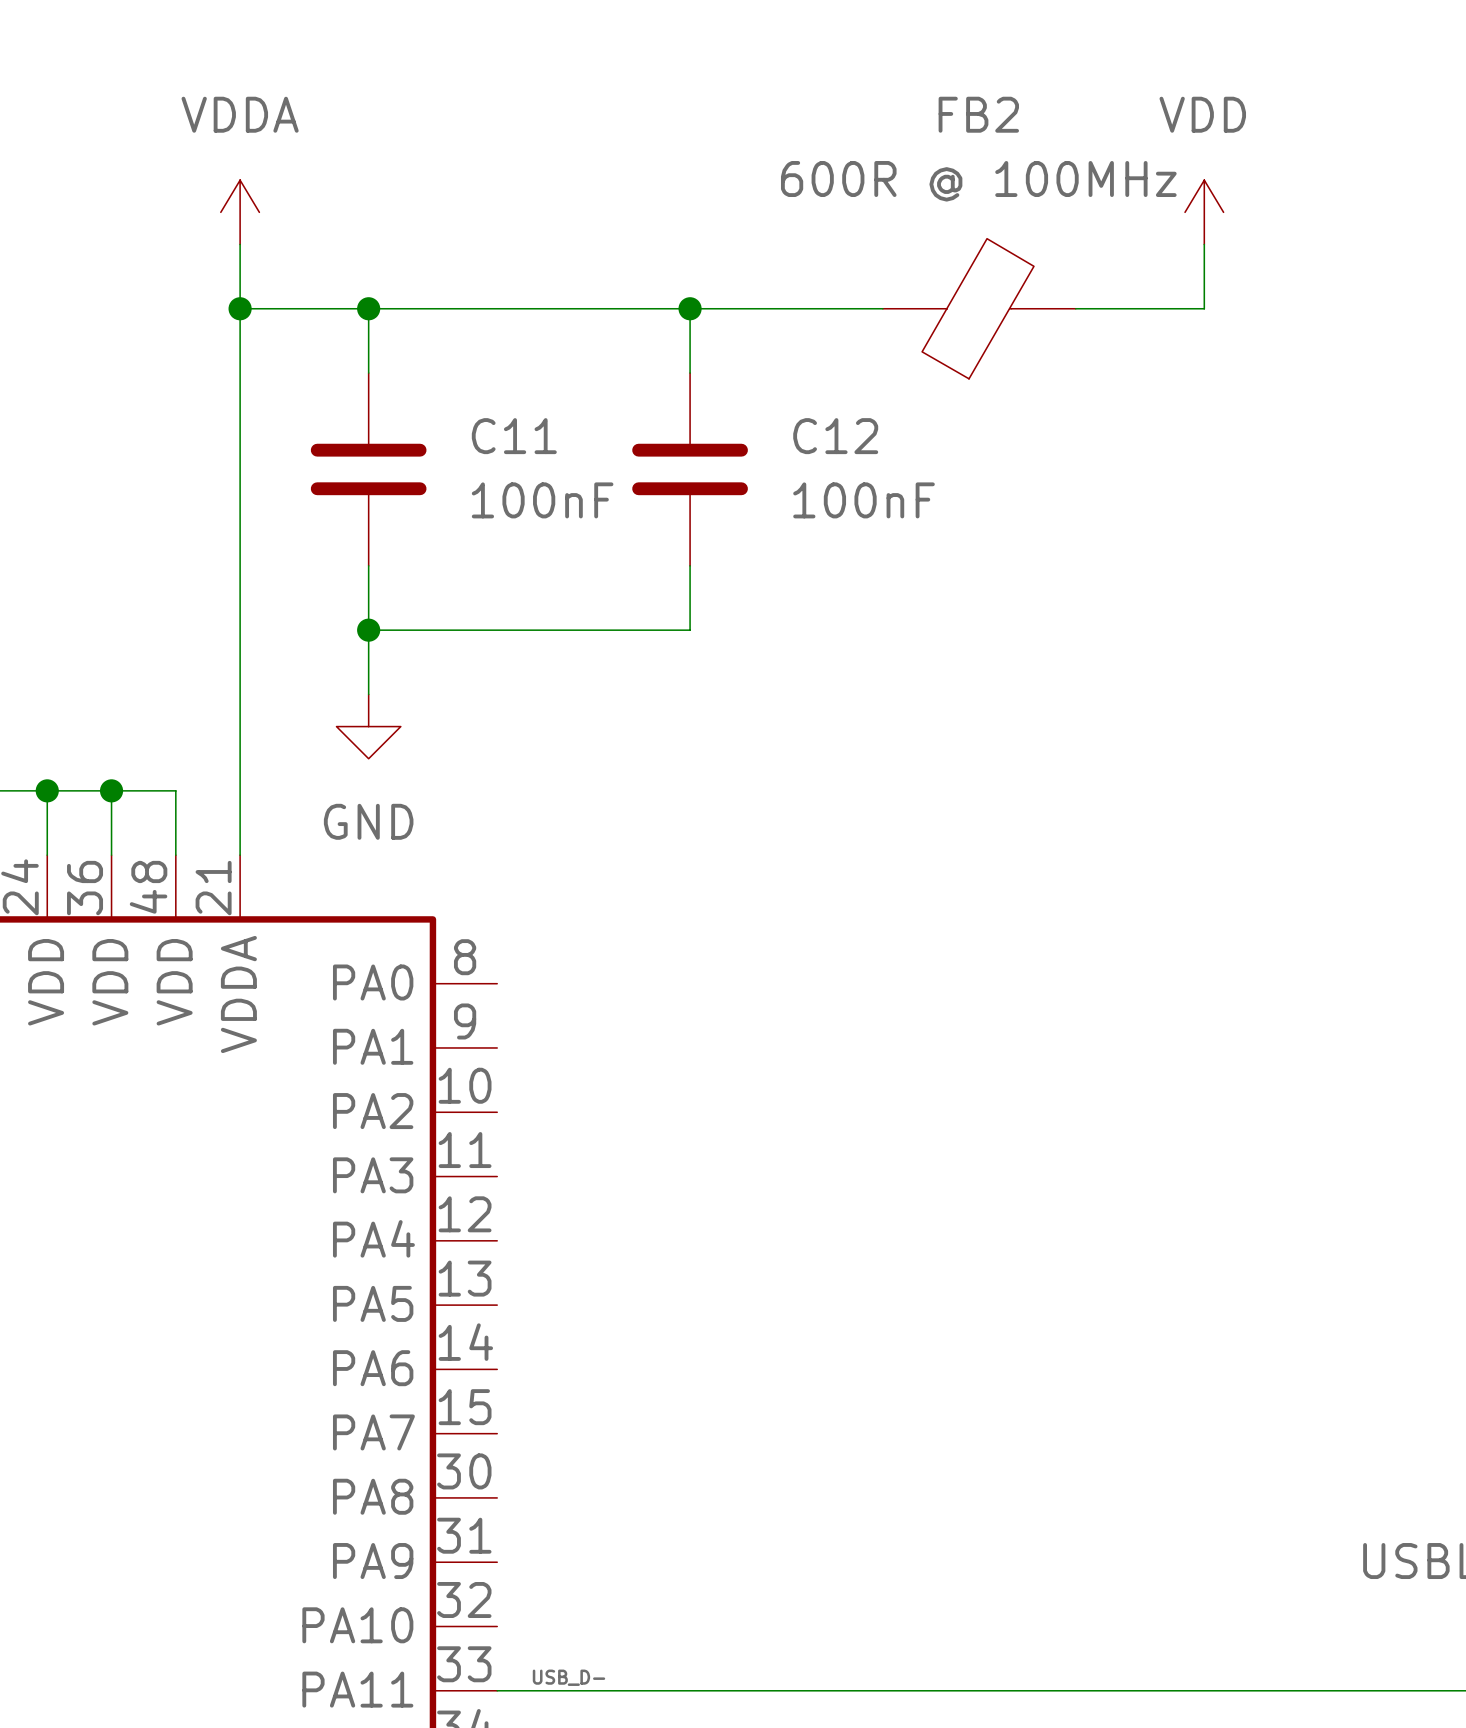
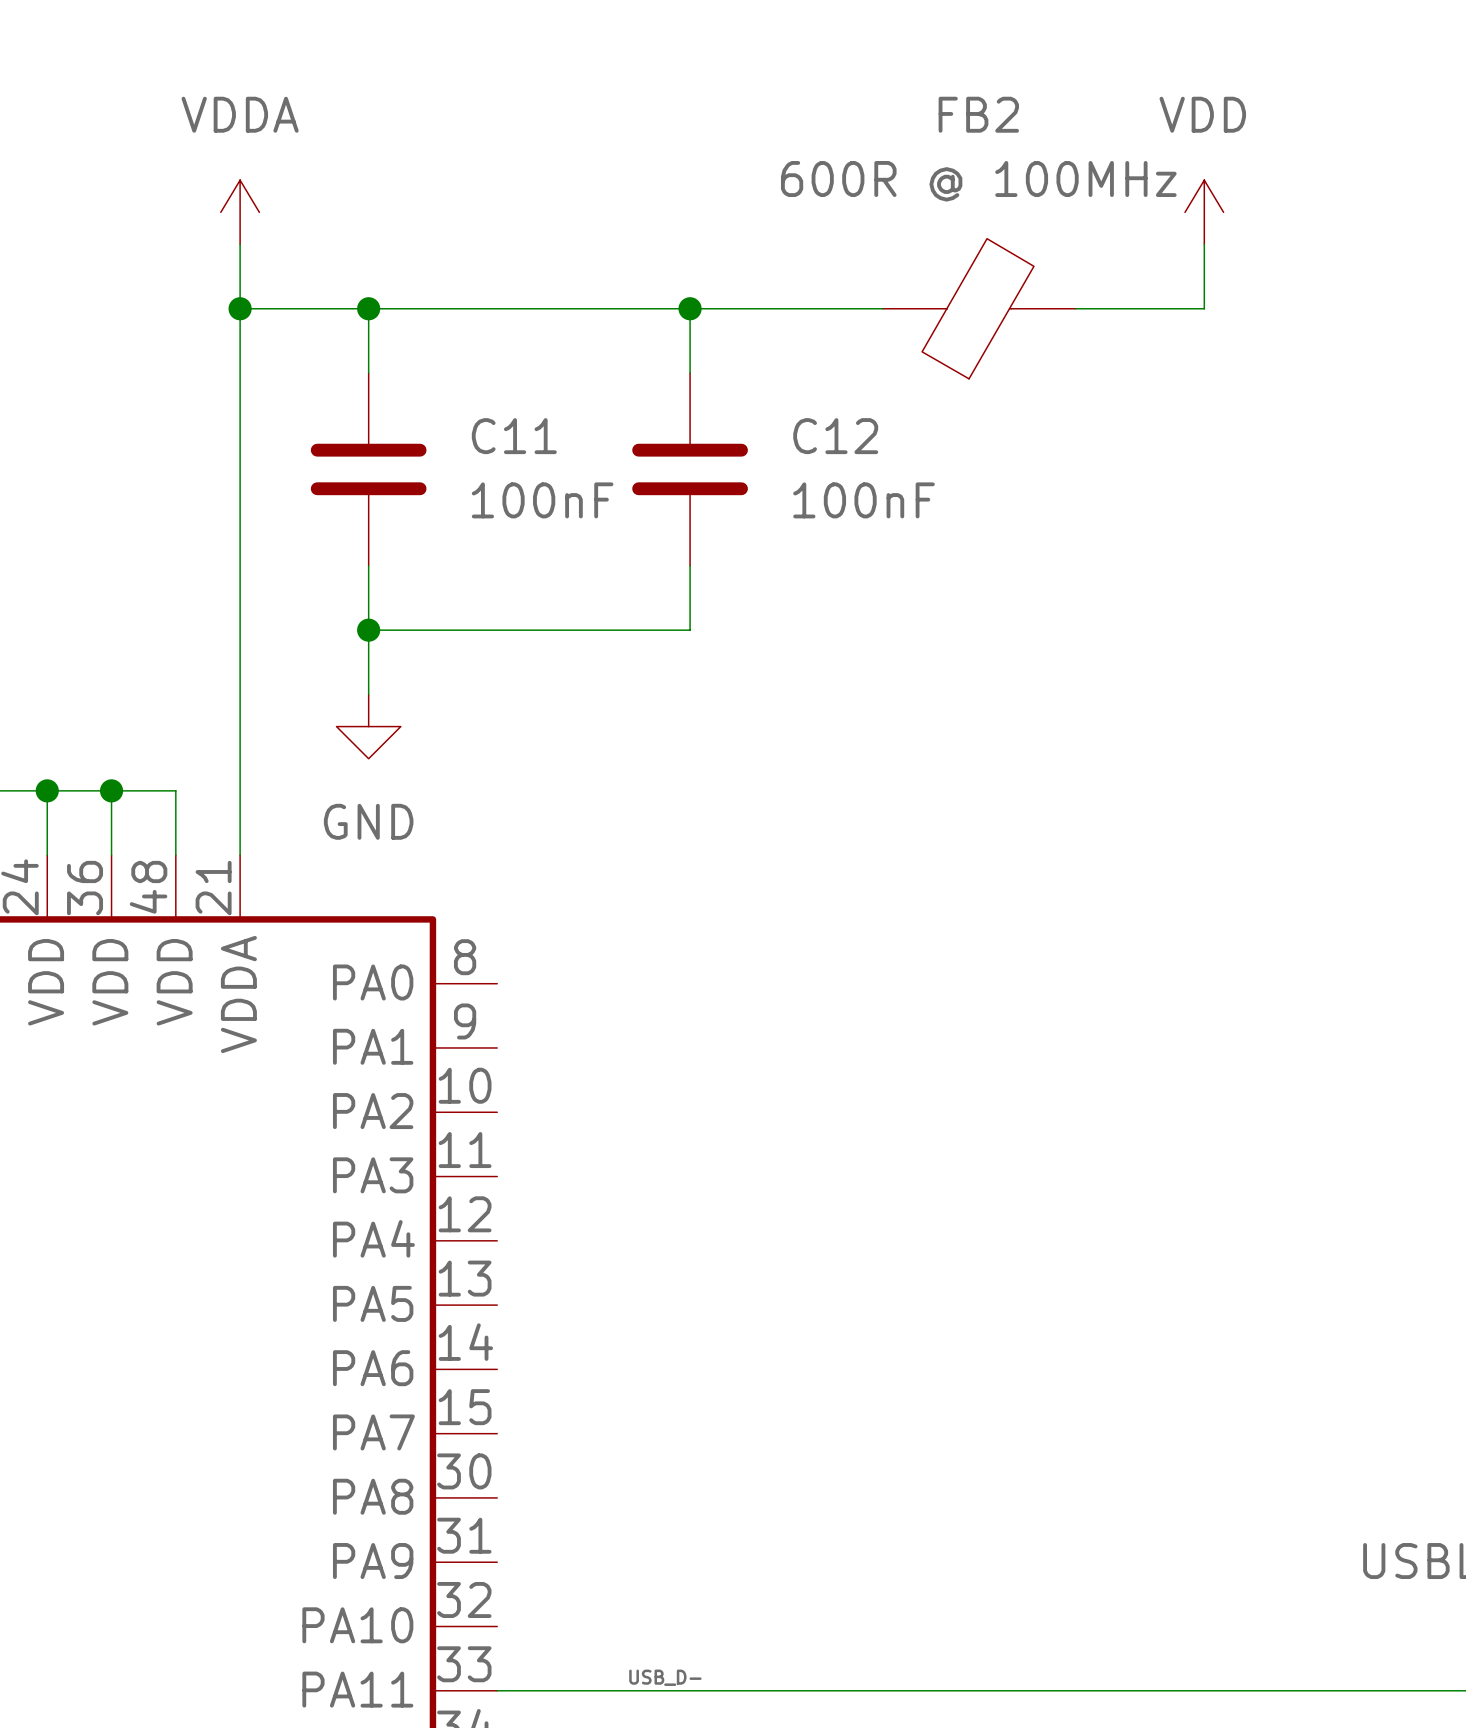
label position: USB_D- (568, 1677) -> USB_D- (665, 1677)

